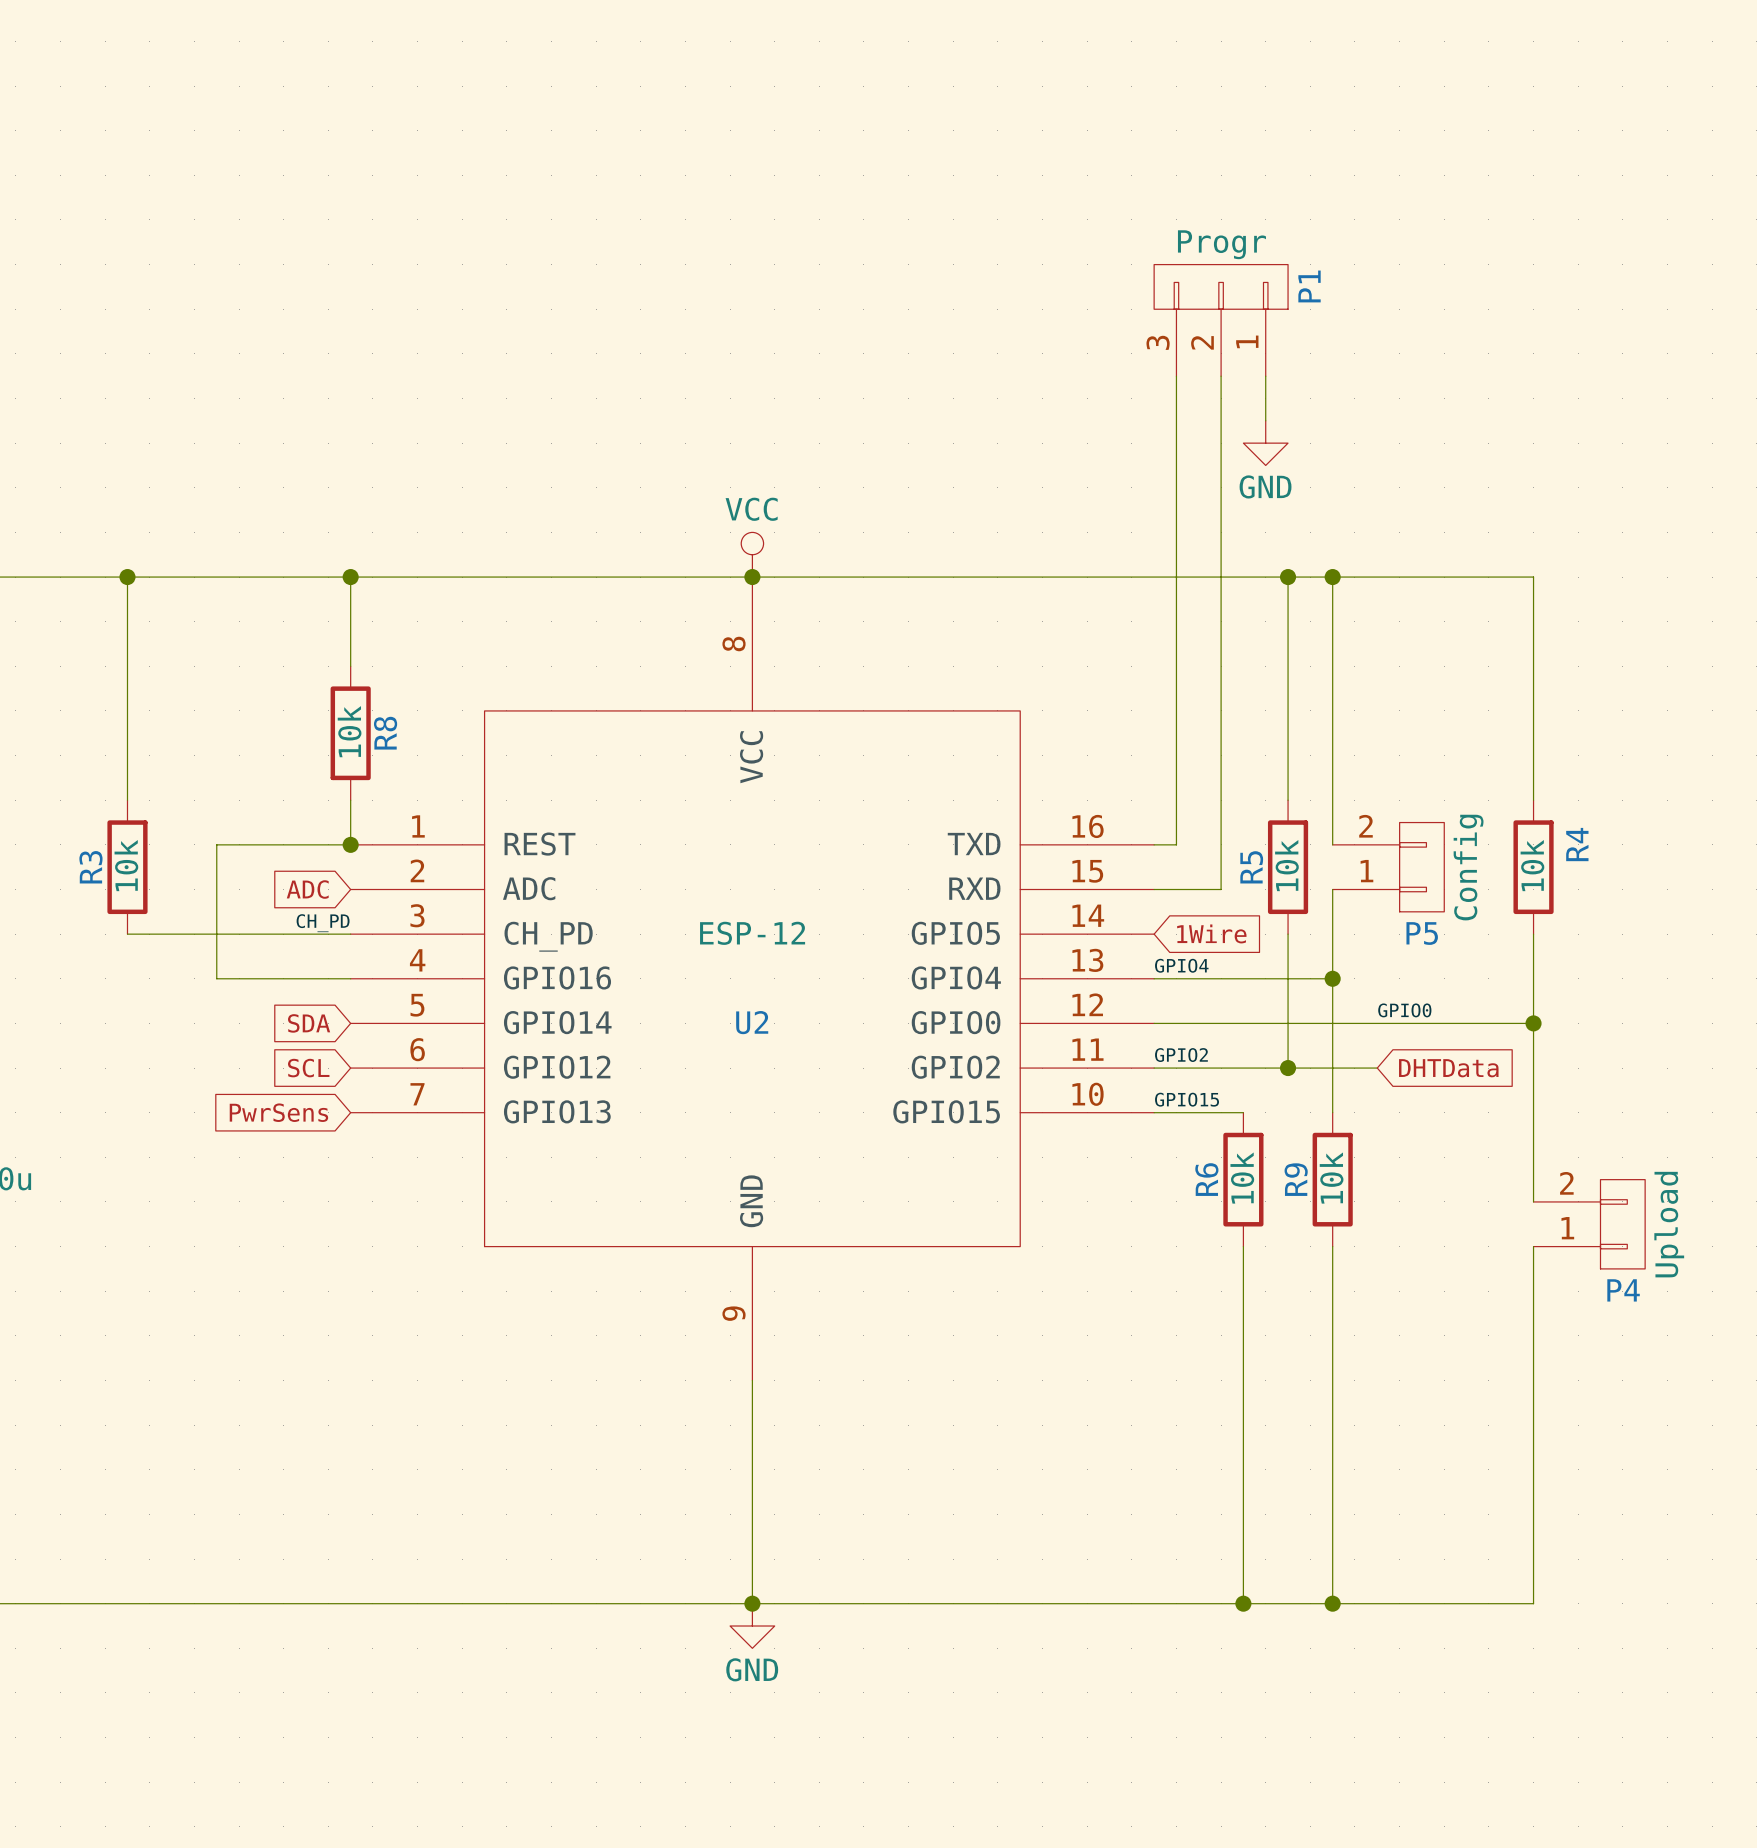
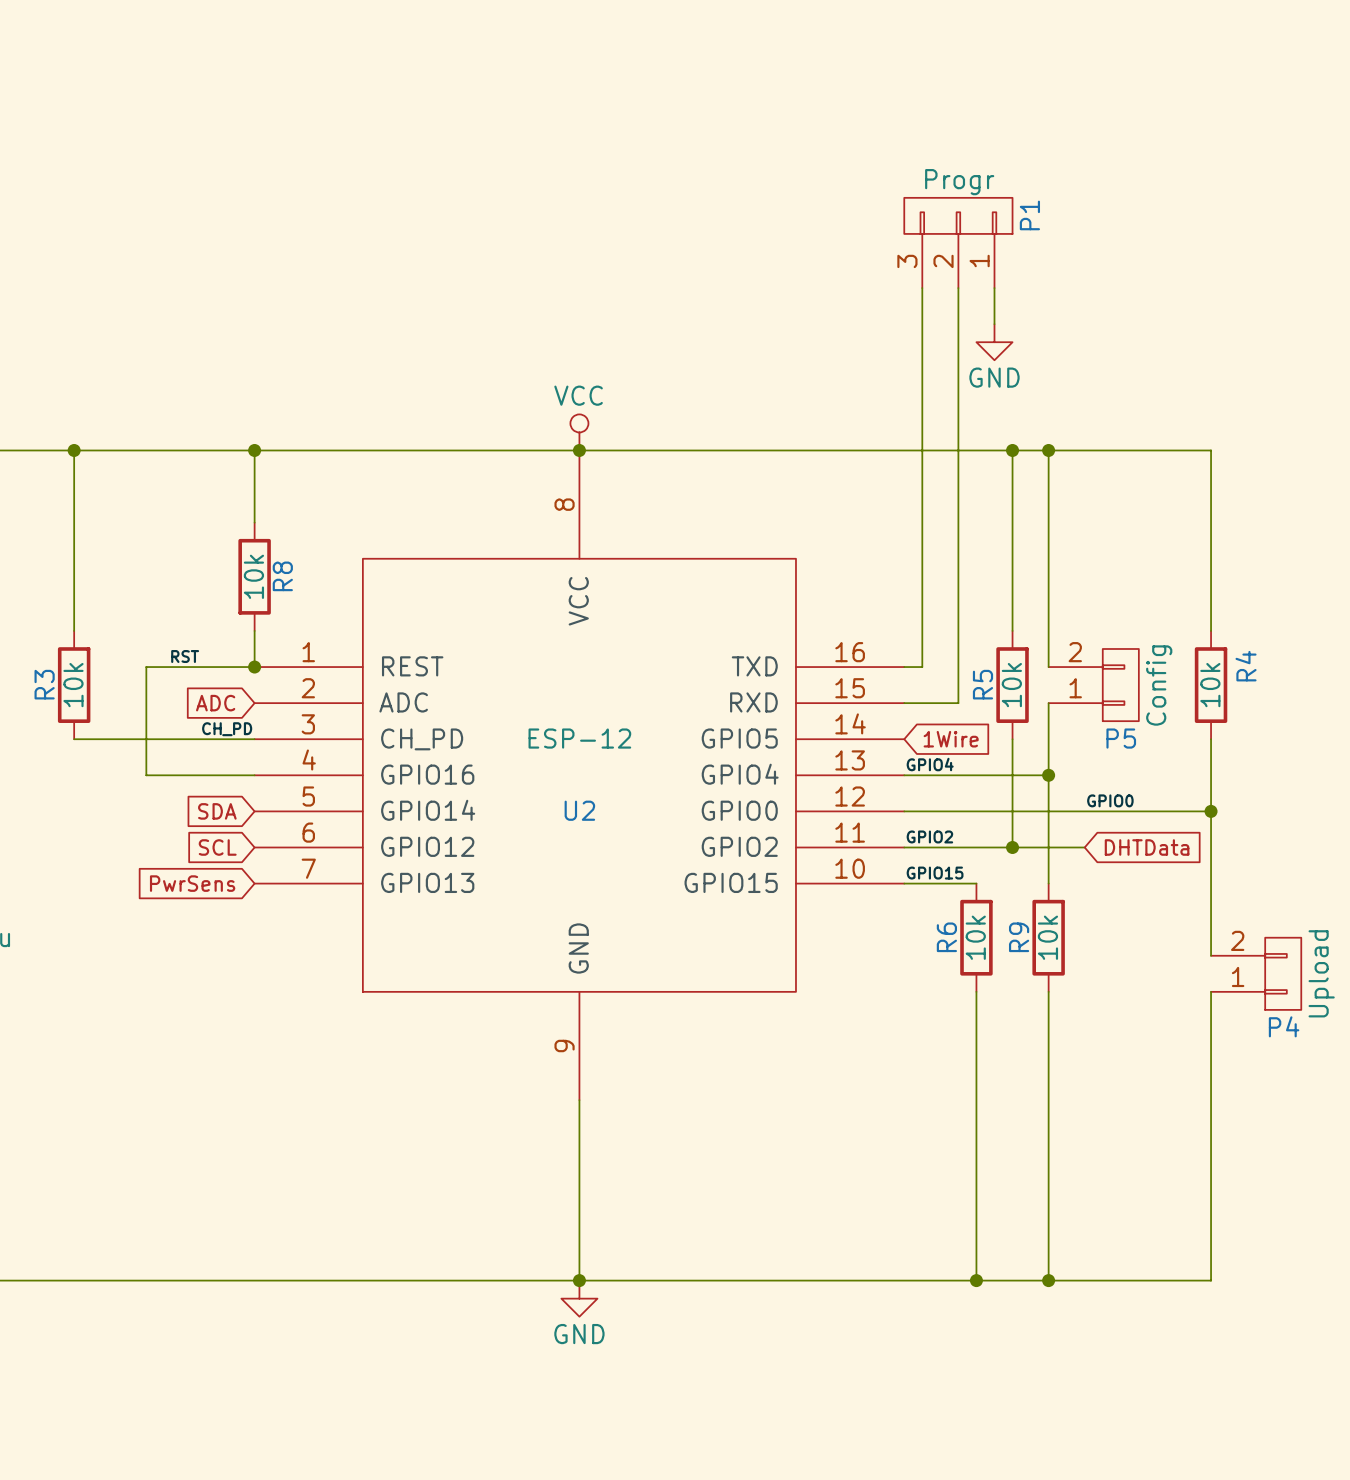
label: none -> RST (185, 656)

